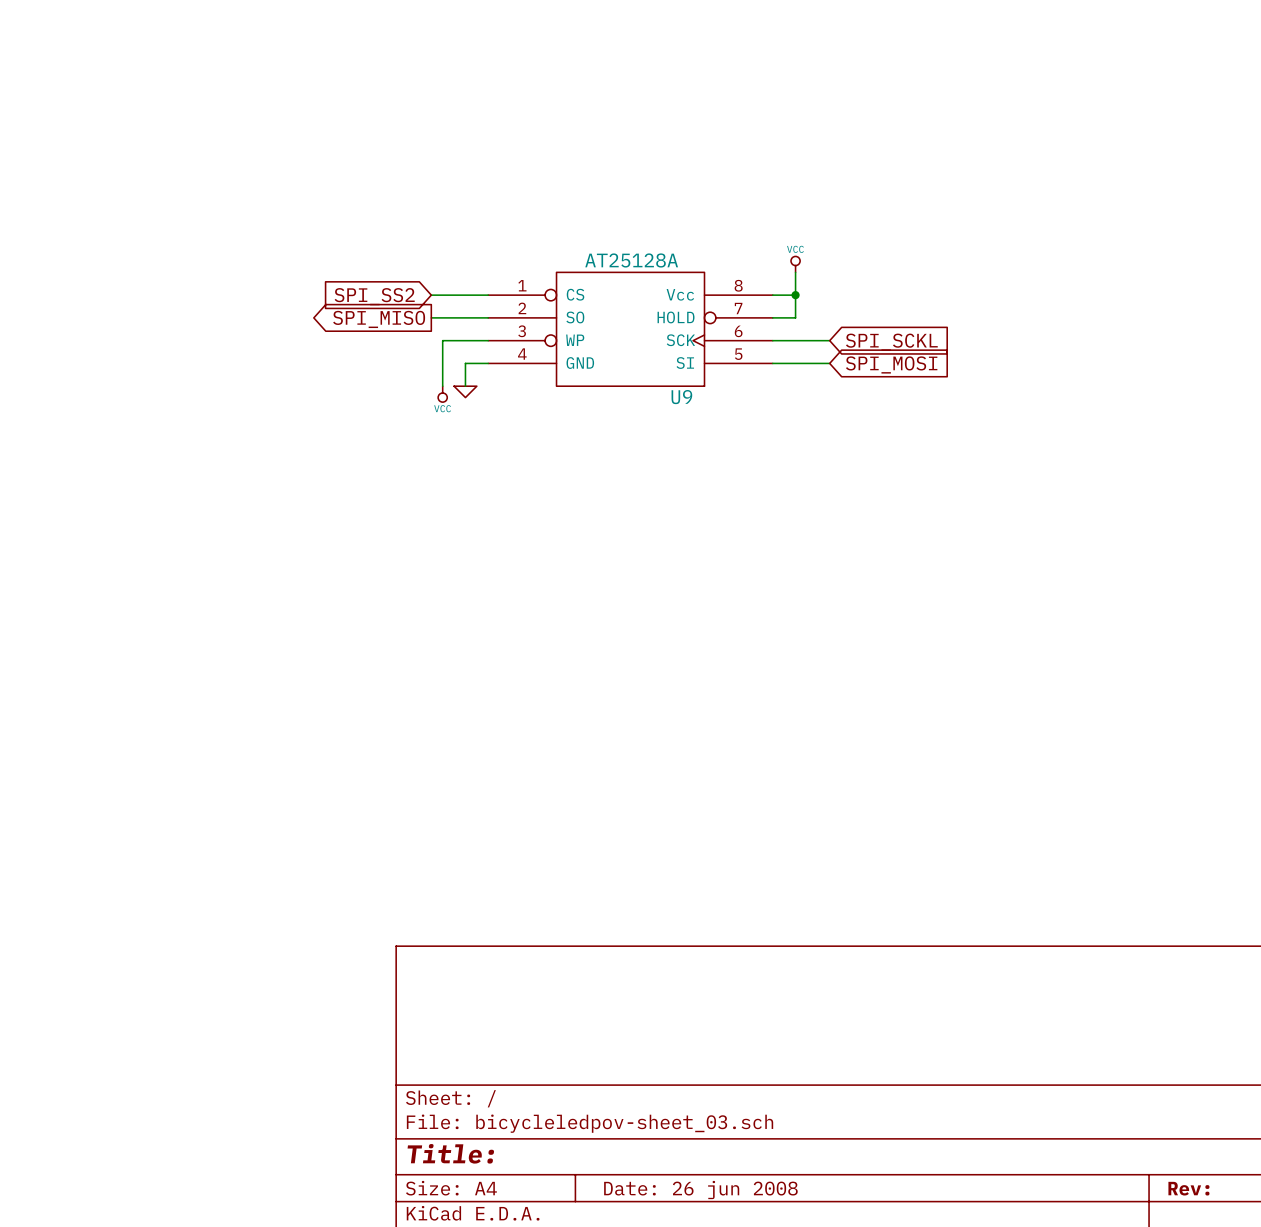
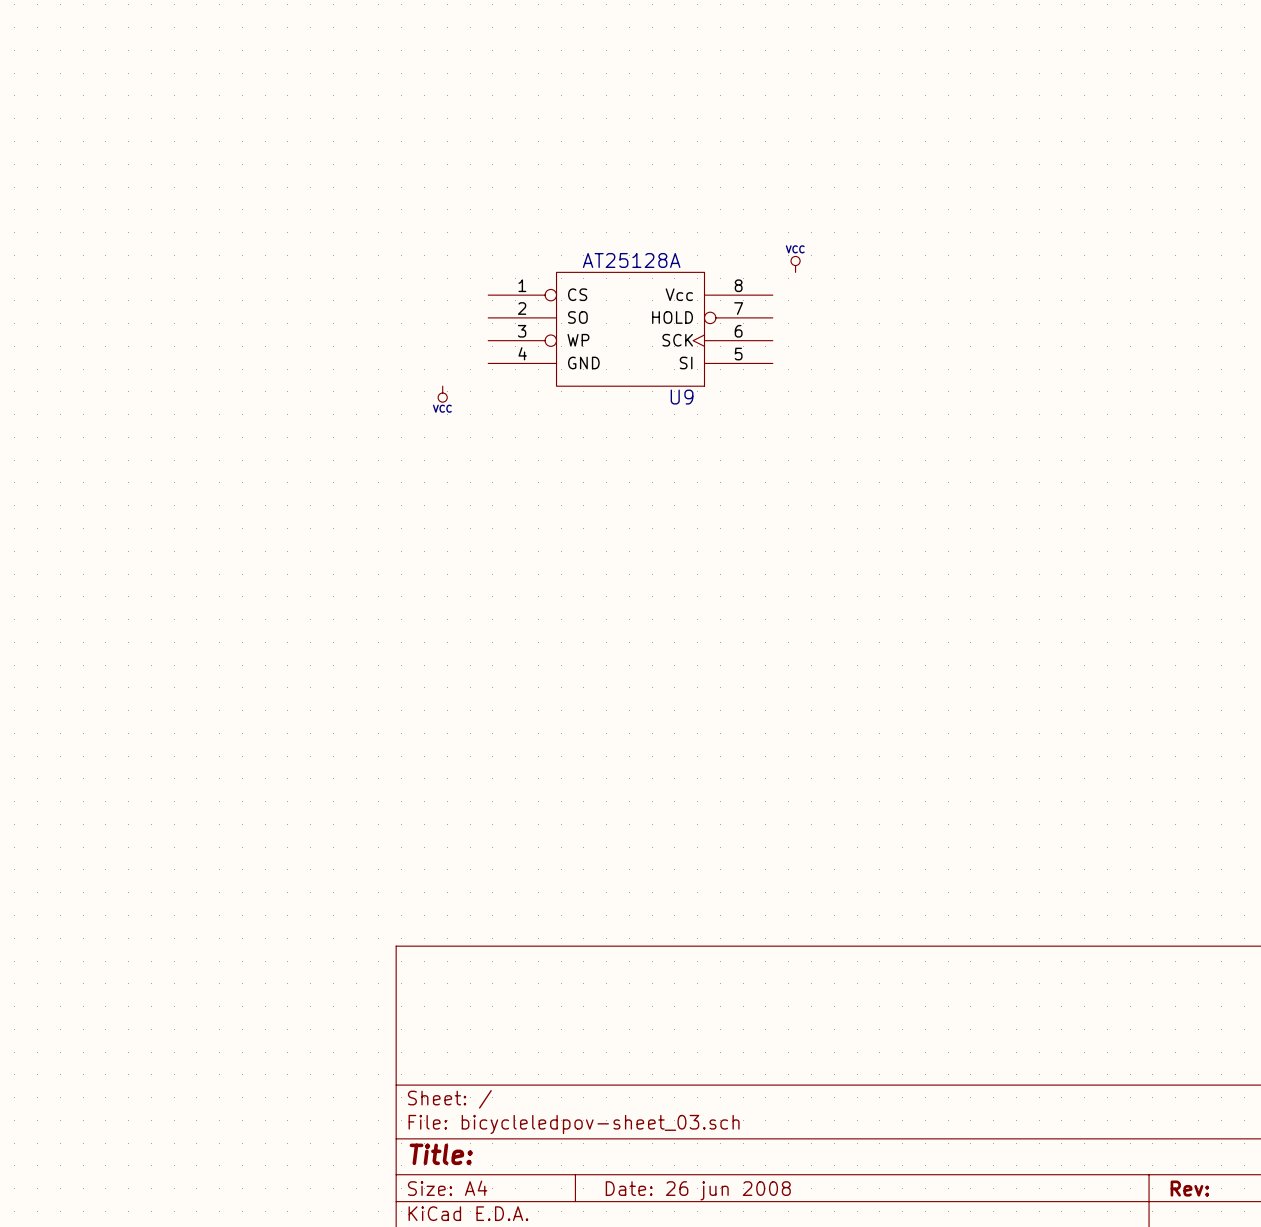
wire: (795, 272) (795, 317) (772, 317) -> none
wire: (431, 295) (488, 295) -> none
wire: (772, 295) (795, 295) -> none
junction: (795, 295) -> none
global label: SPI_SS2 (374, 296) -> none
wire: (431, 317) (488, 317) -> none
global label: SPI_MISO (379, 319) -> none
wire: (488, 340) (442, 340) (442, 386) -> none
wire: (772, 340) (829, 340) -> none
global label: SPI_SCKL (891, 342) -> none
wire: (488, 363) (465, 363) (465, 386) -> none
wire: (772, 363) (829, 363) -> none
global label: SPI_MOSI (891, 364) -> none
power symbol: (465, 391) -> none

